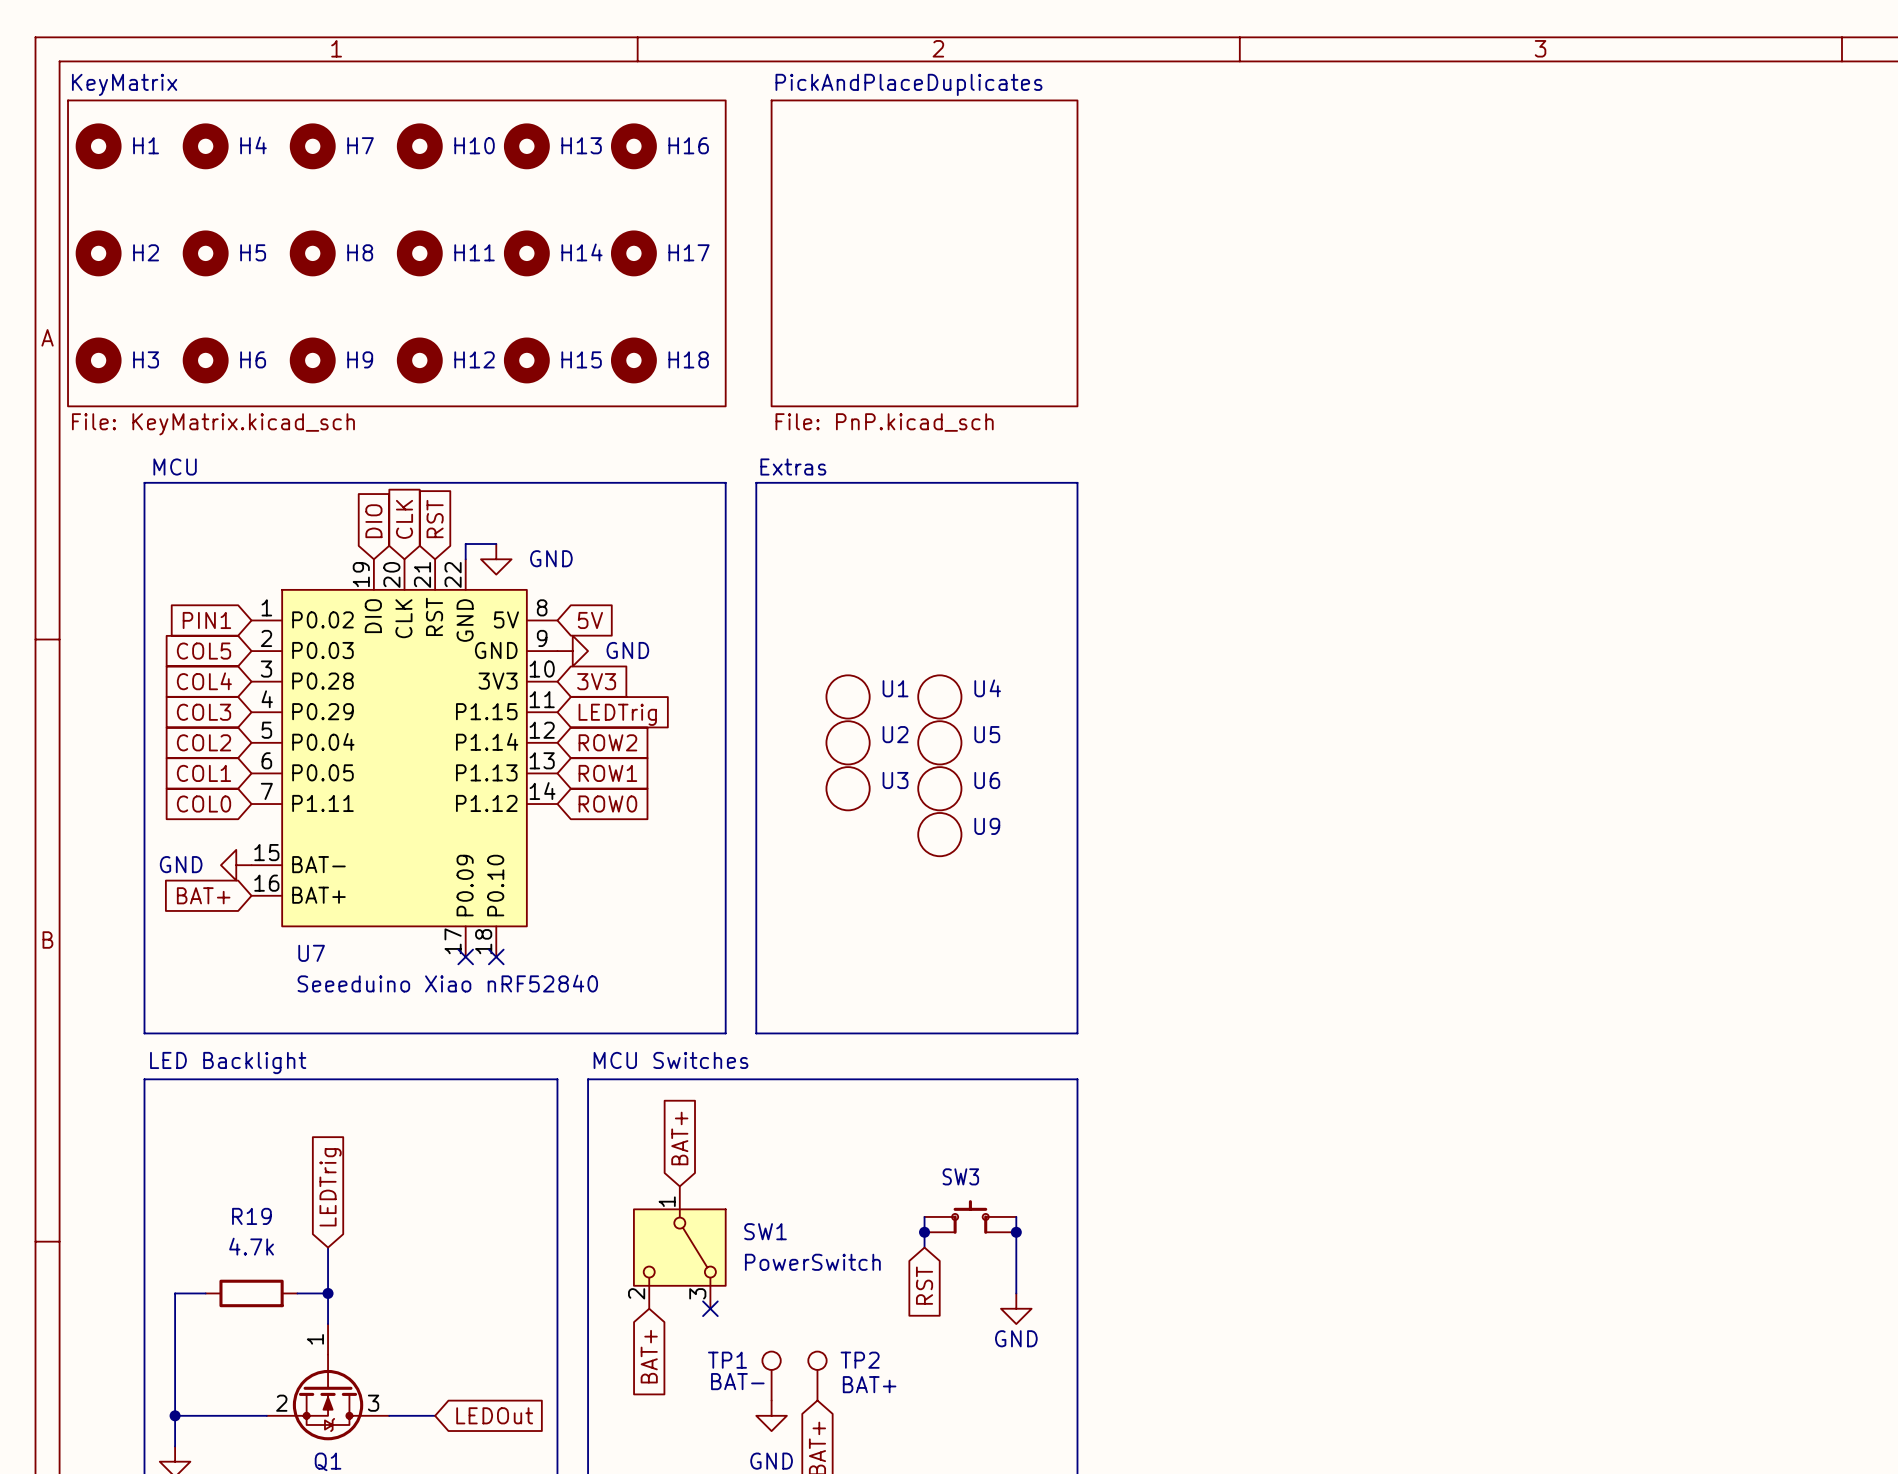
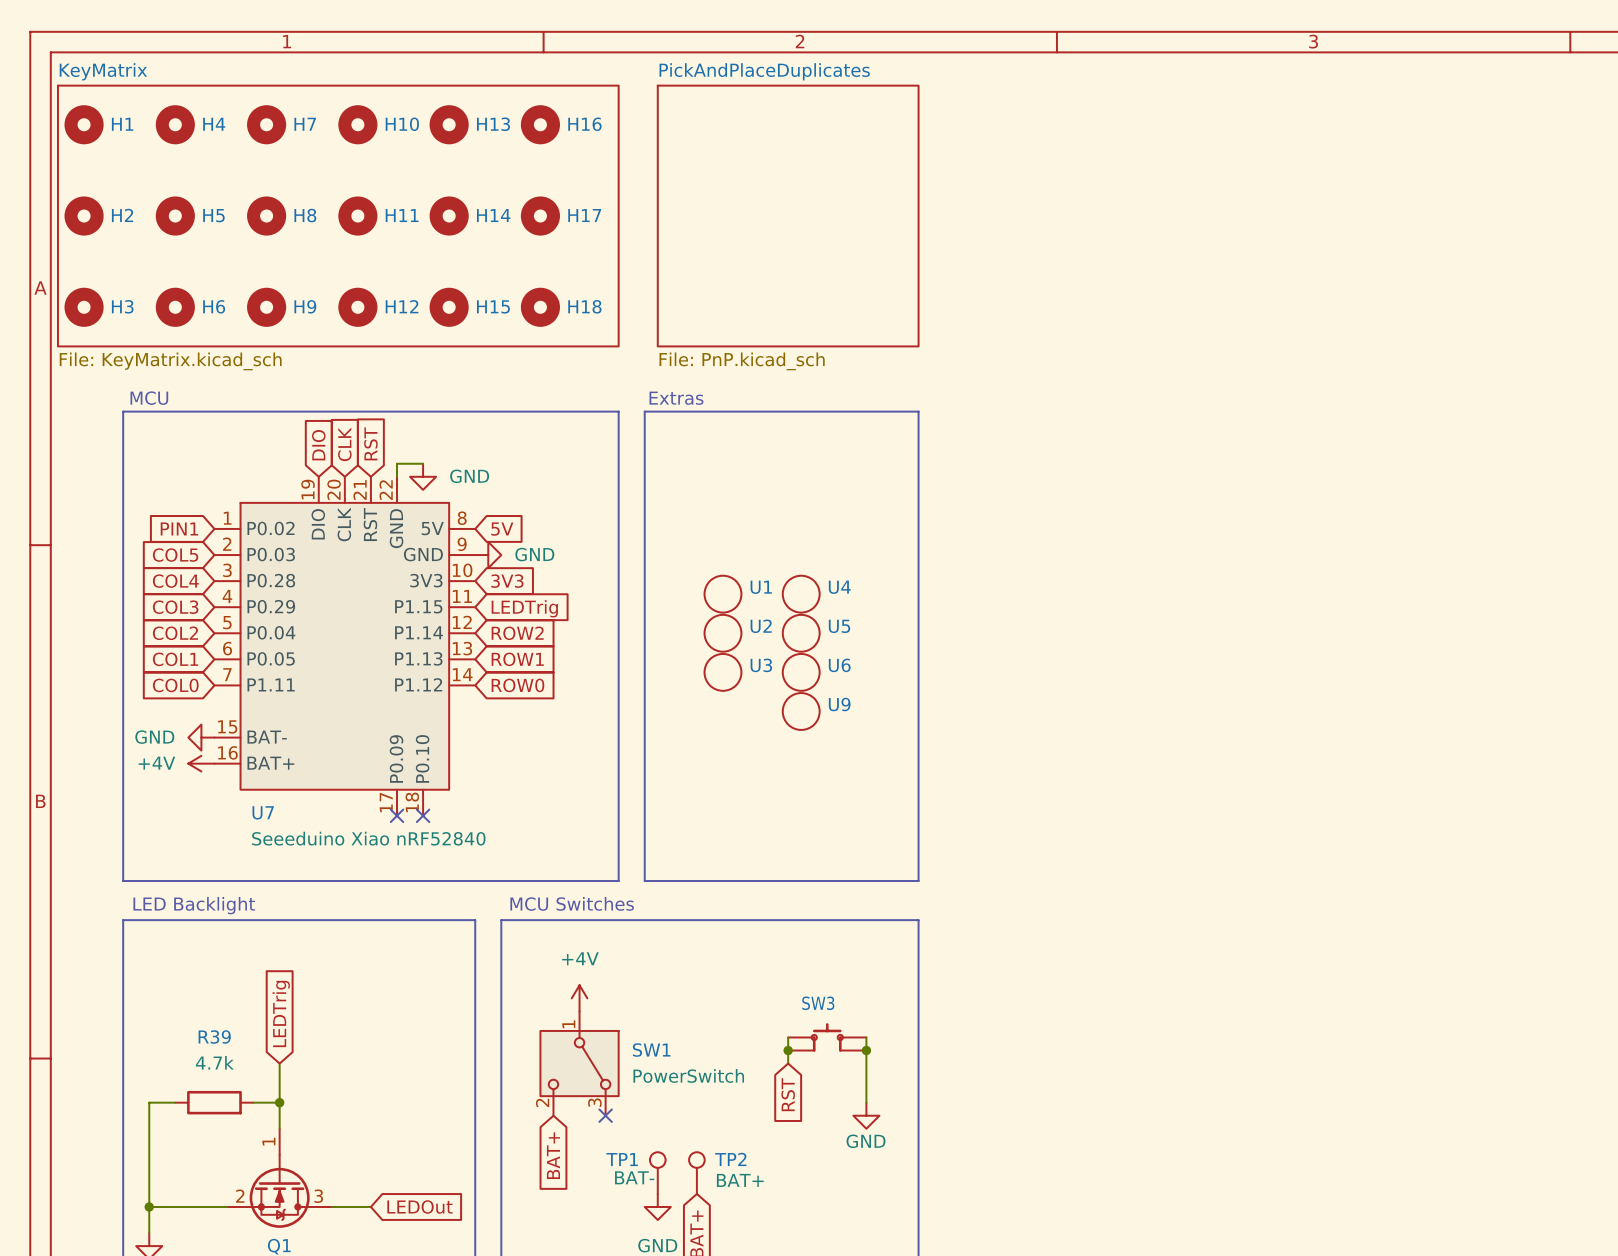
global label: BAT+ (203, 895) -> none
power symbol: none -> +4V (201, 763)
global label: BAT+ (679, 1138) -> none
power symbol: none -> +4V (579, 998)
R19 name: R19 (251, 1216) -> R39 (214, 1037)

